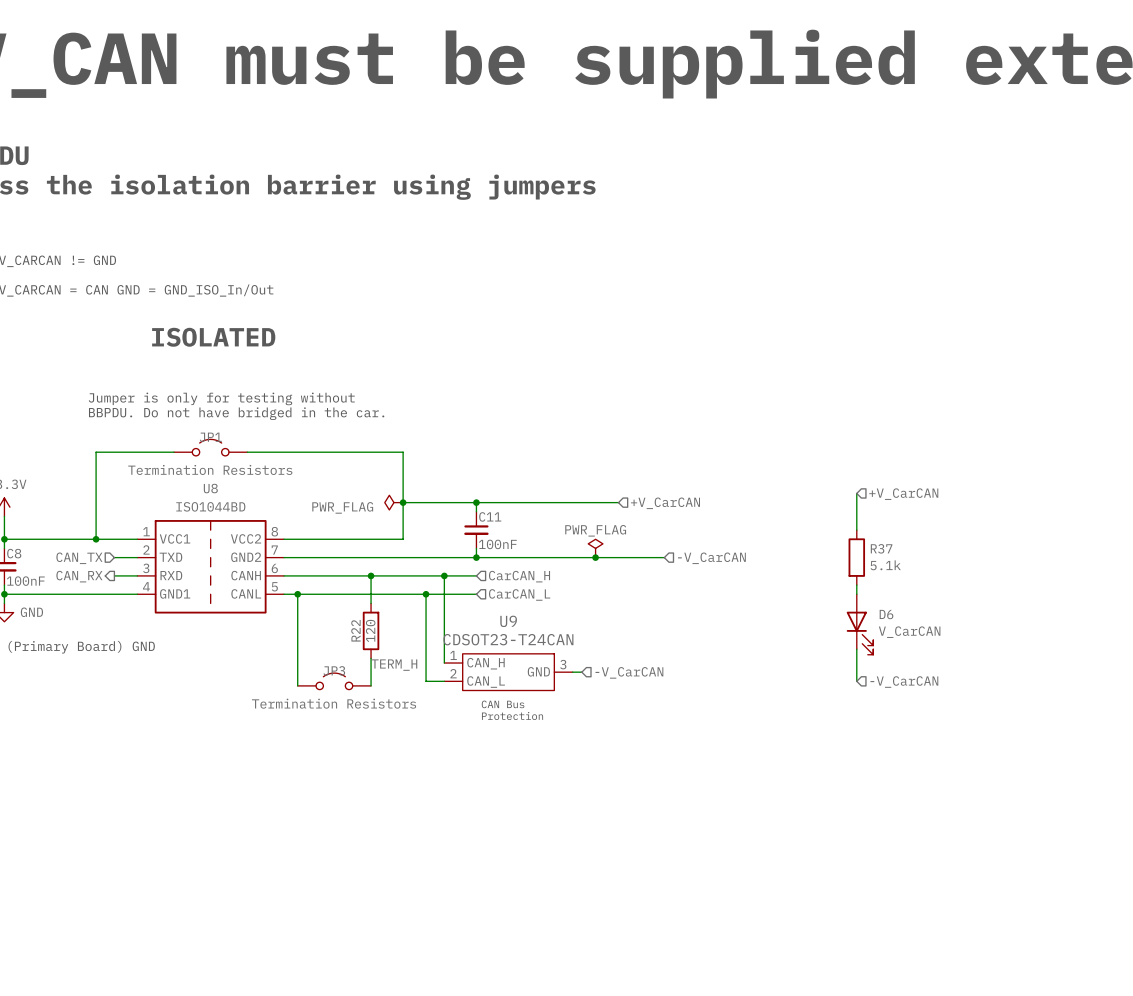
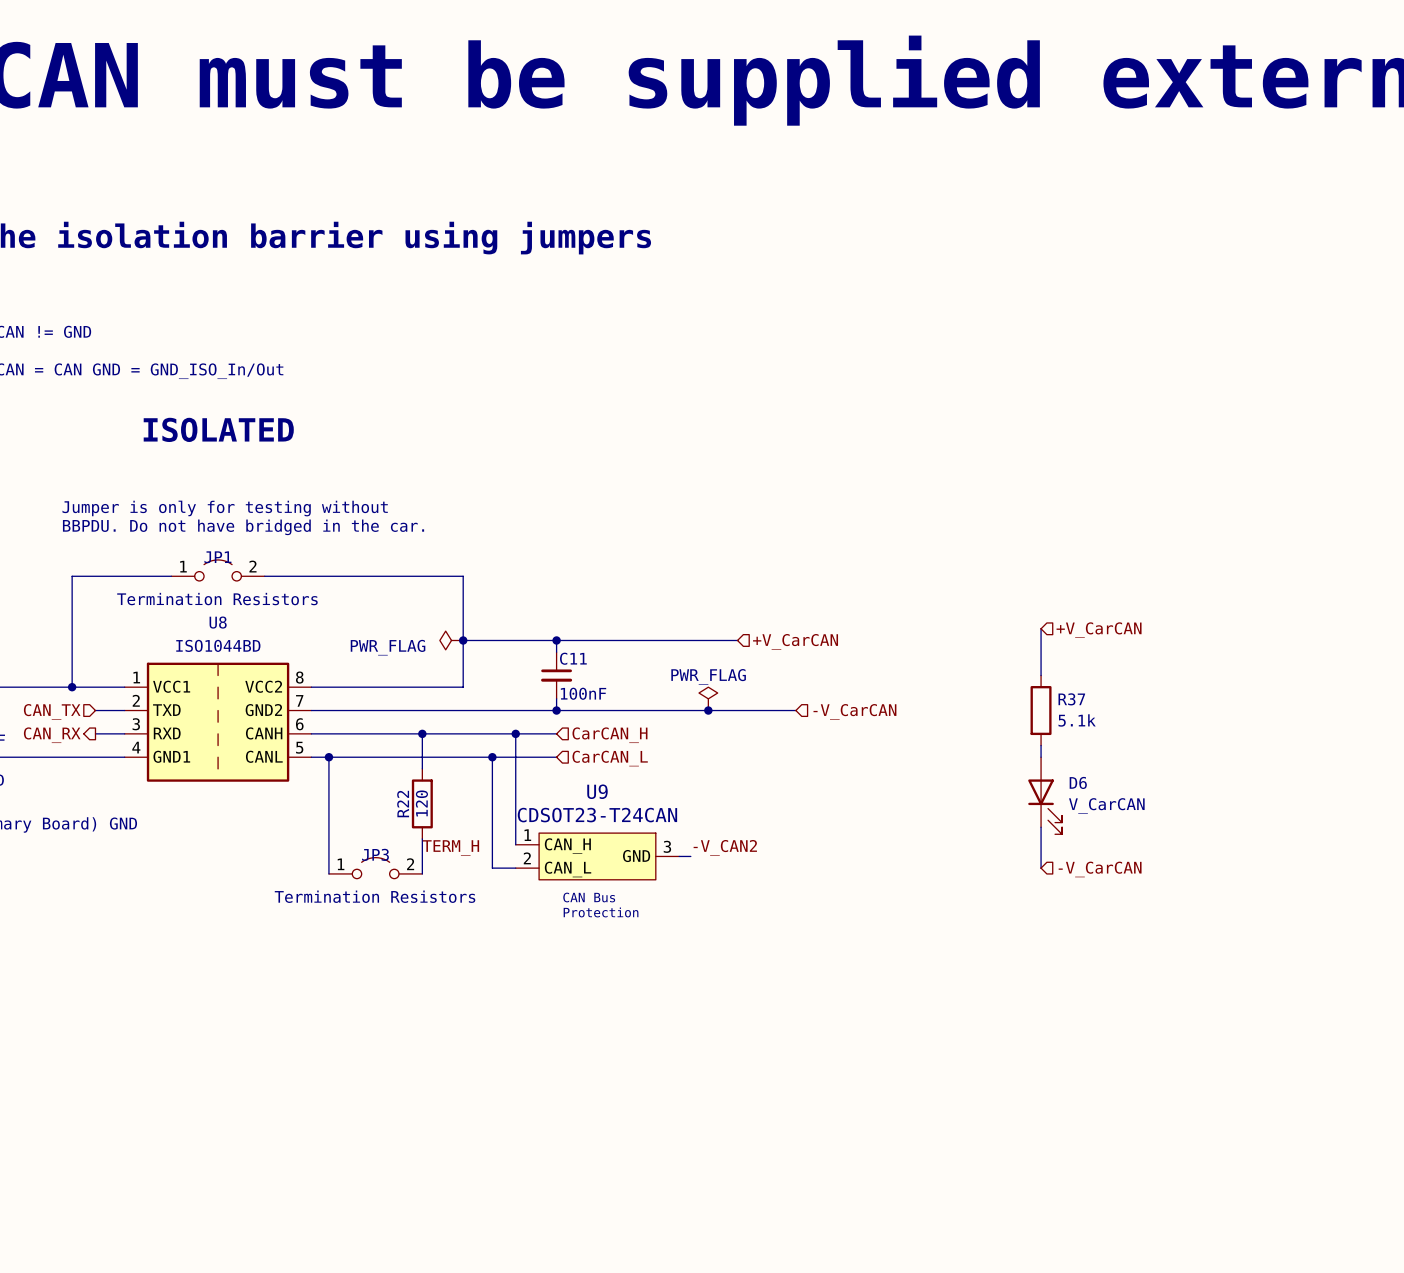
JP1 pin number: none -> 1 (183, 566)
JP1 pin number: none -> 2 (252, 566)
label: none -> -V_CAN2 (725, 847)
hierarchical label: -V_CarCAN (629, 672) -> none
JP3 pin number: none -> 1 (341, 864)
JP3 pin number: none -> 2 (410, 864)

